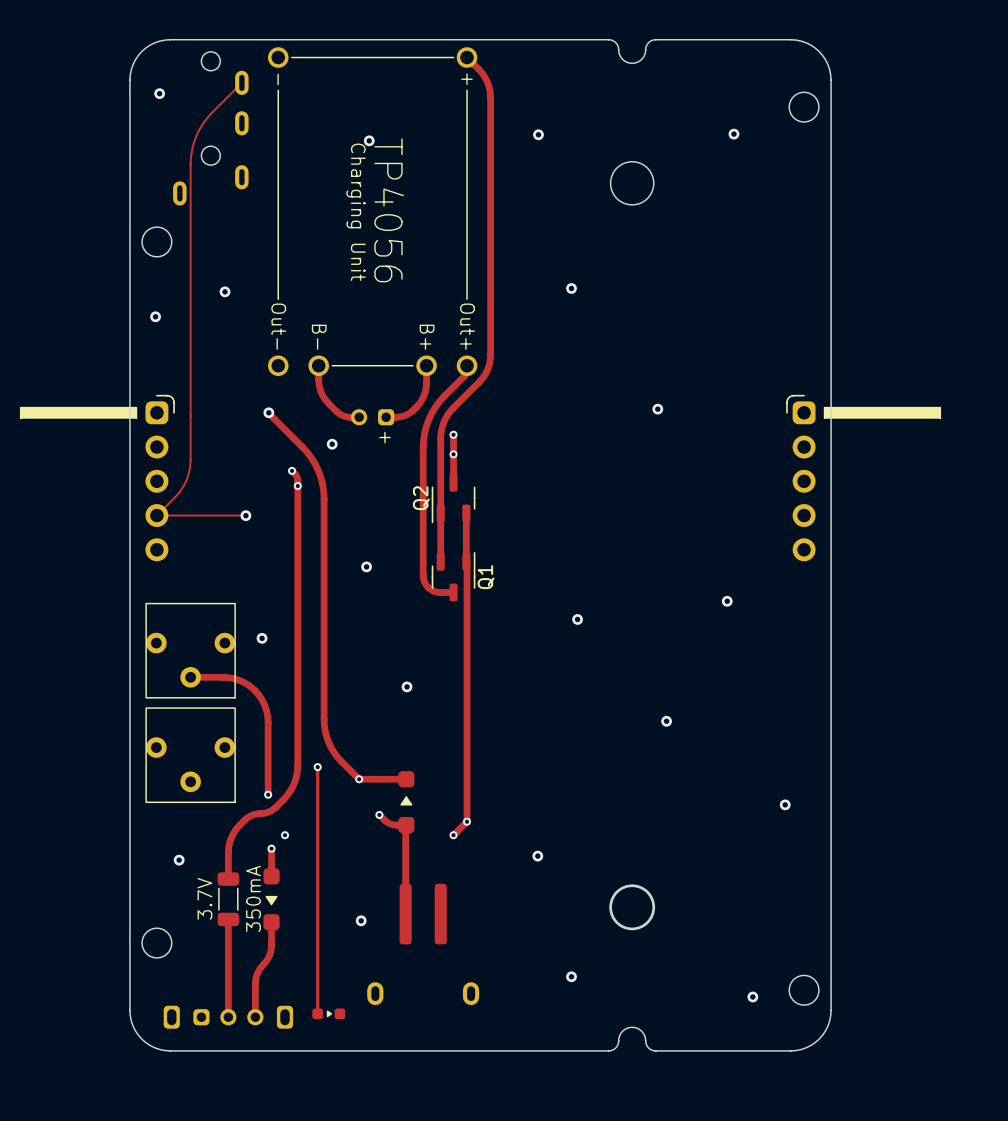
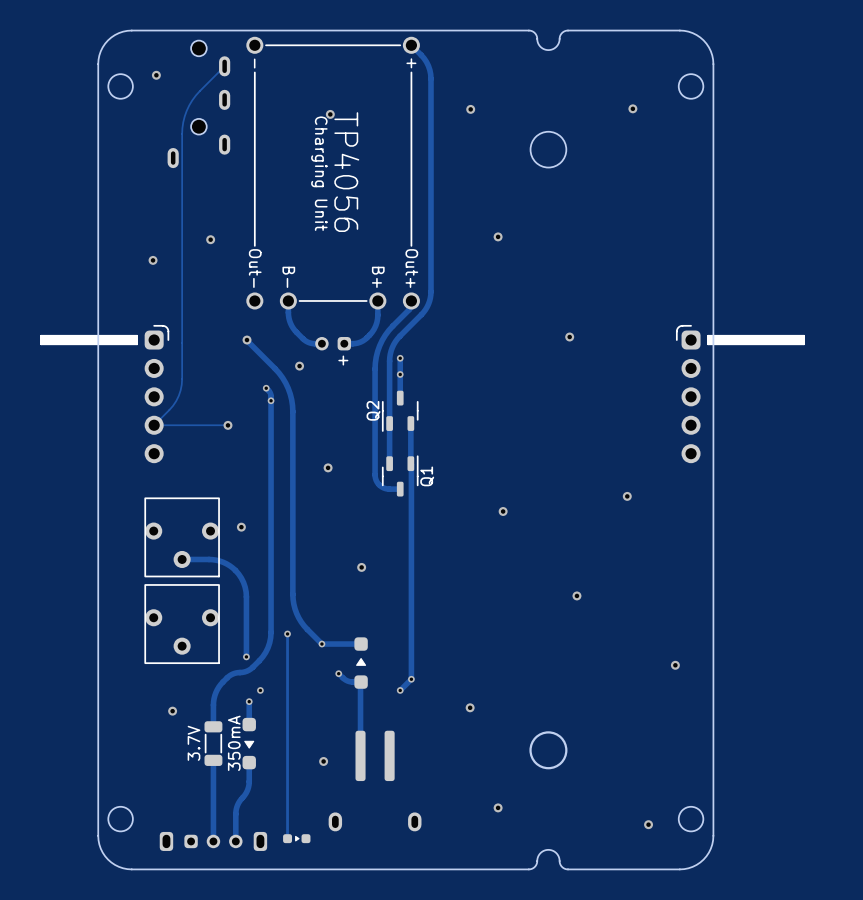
board edge: (170, 39) (154, 42) (141, 51) (133, 64) (129, 80) (129, 1010) (133, 1025) (141, 1039) (154, 1047) (170, 1050) -> (165, 30) (127, 30) (115, 35) (102, 47) (98, 64) (98, 840) (105, 856) (118, 866) (131, 869) (165, 869)
round board edge position: (156, 241) -> (120, 86)
round board edge position: (156, 943) -> (120, 819)

